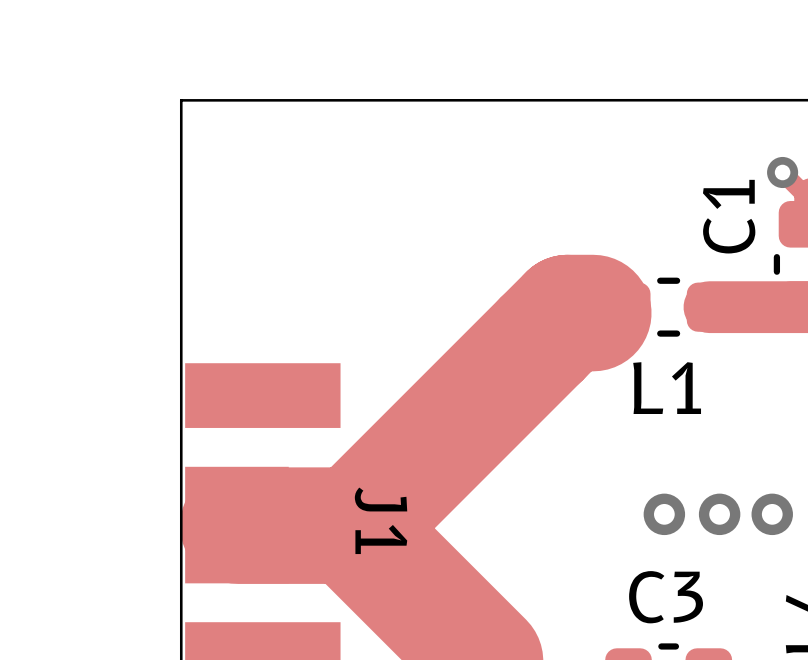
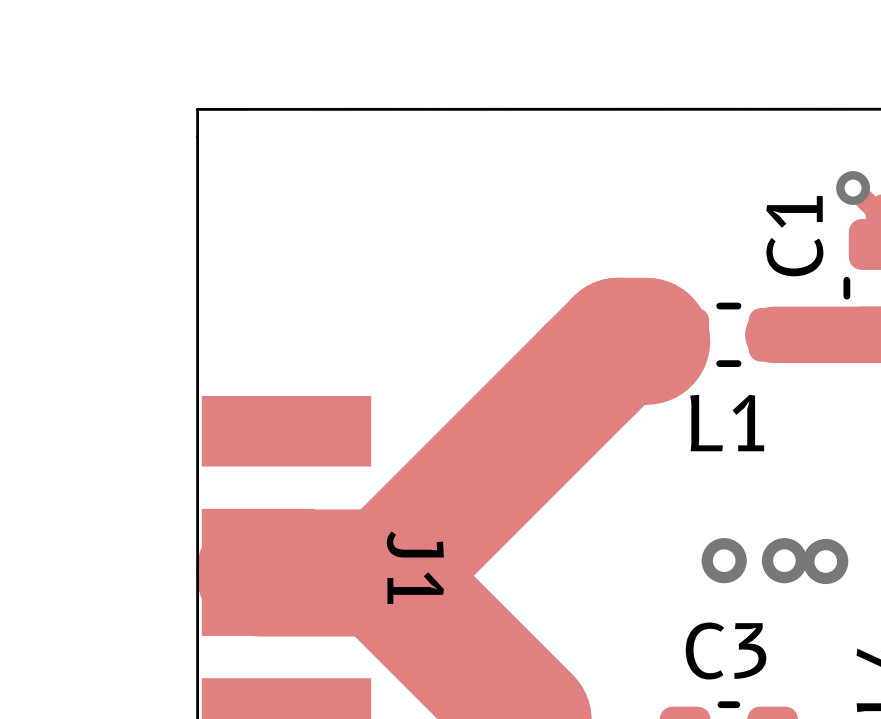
via position: (772, 514) -> (825, 561)

